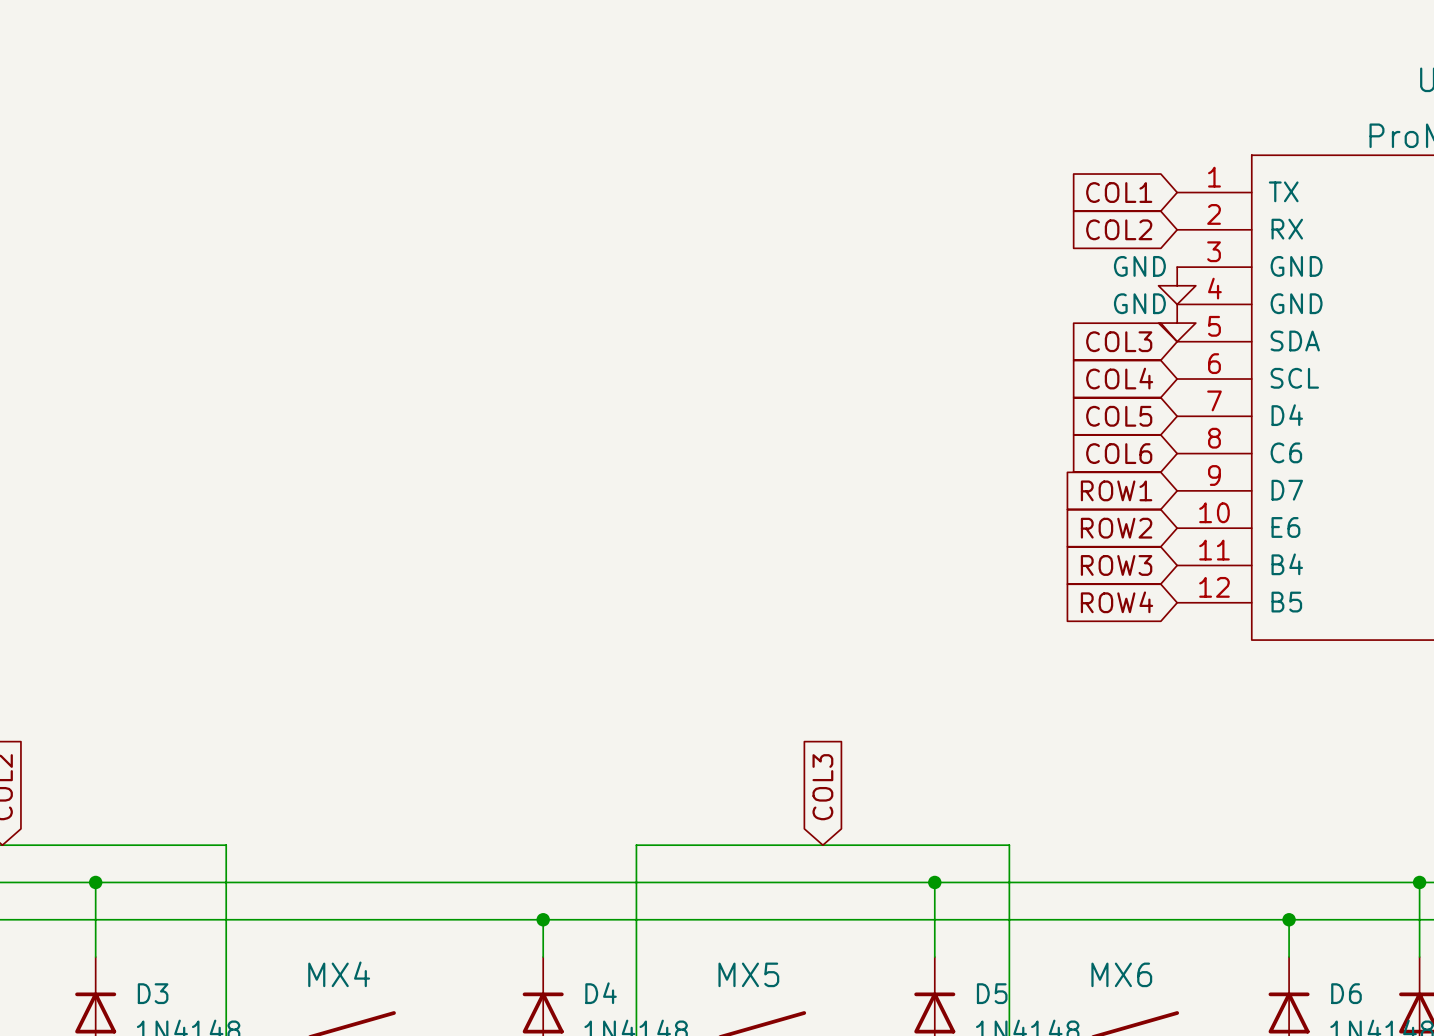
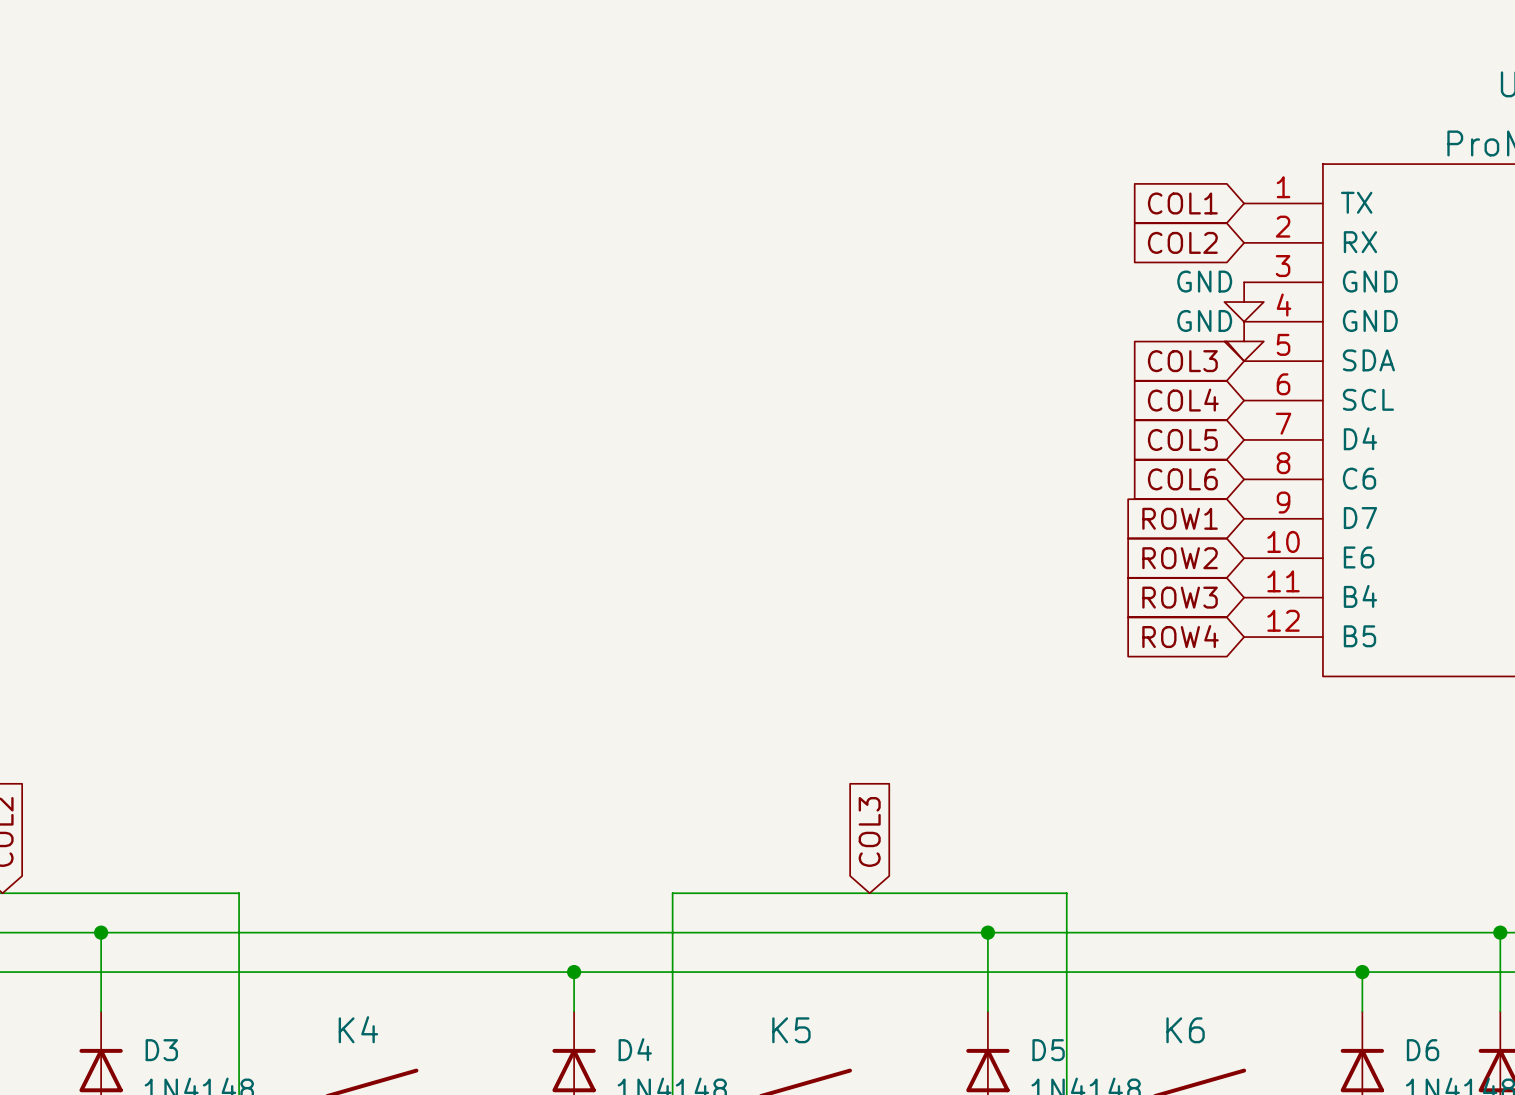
MX4 name: MX4 (339, 974) -> K4 (358, 1029)
MX5 name: MX5 (748, 974) -> K5 (791, 1030)
MX6 name: MX6 (1121, 974) -> K6 (1185, 1030)

